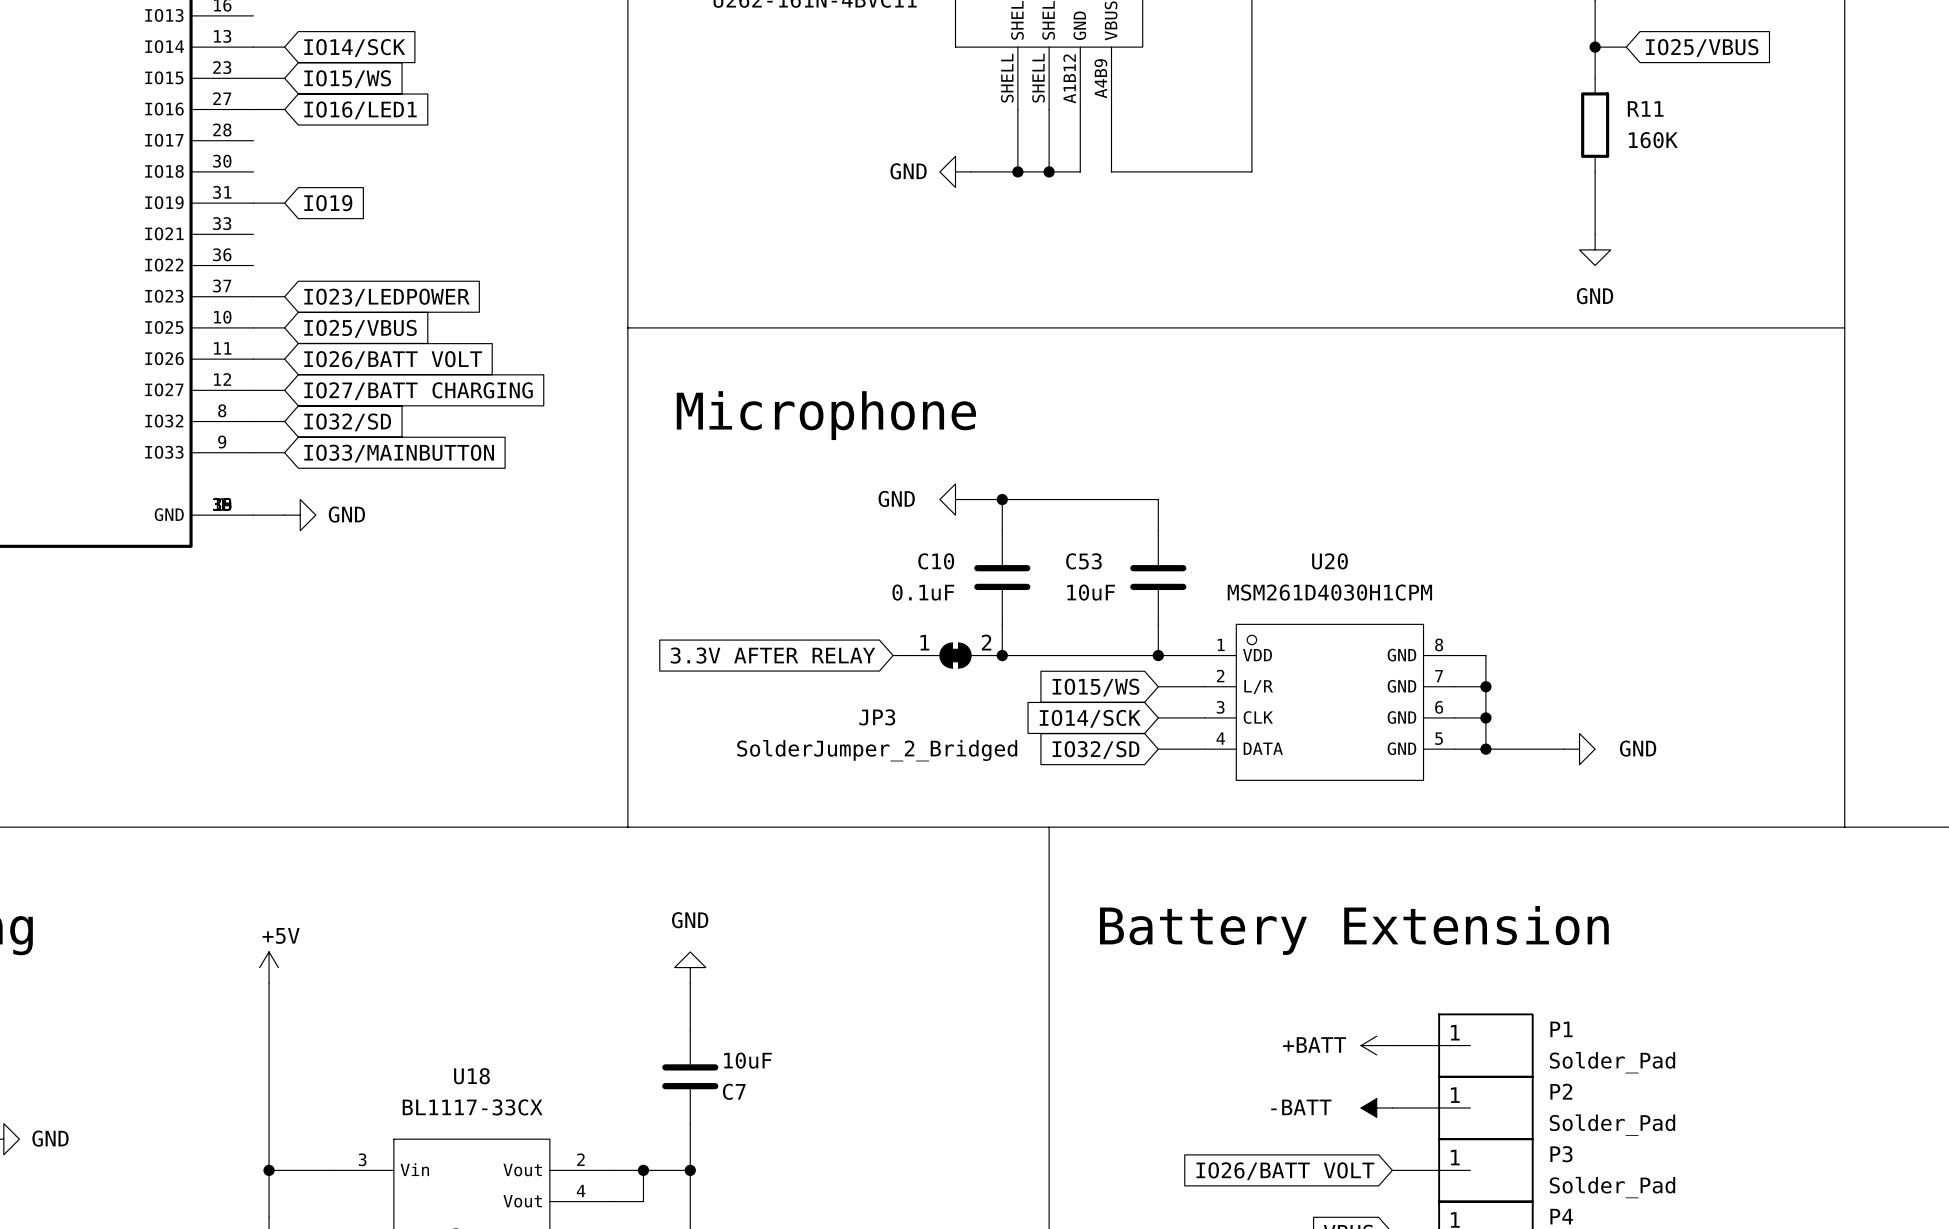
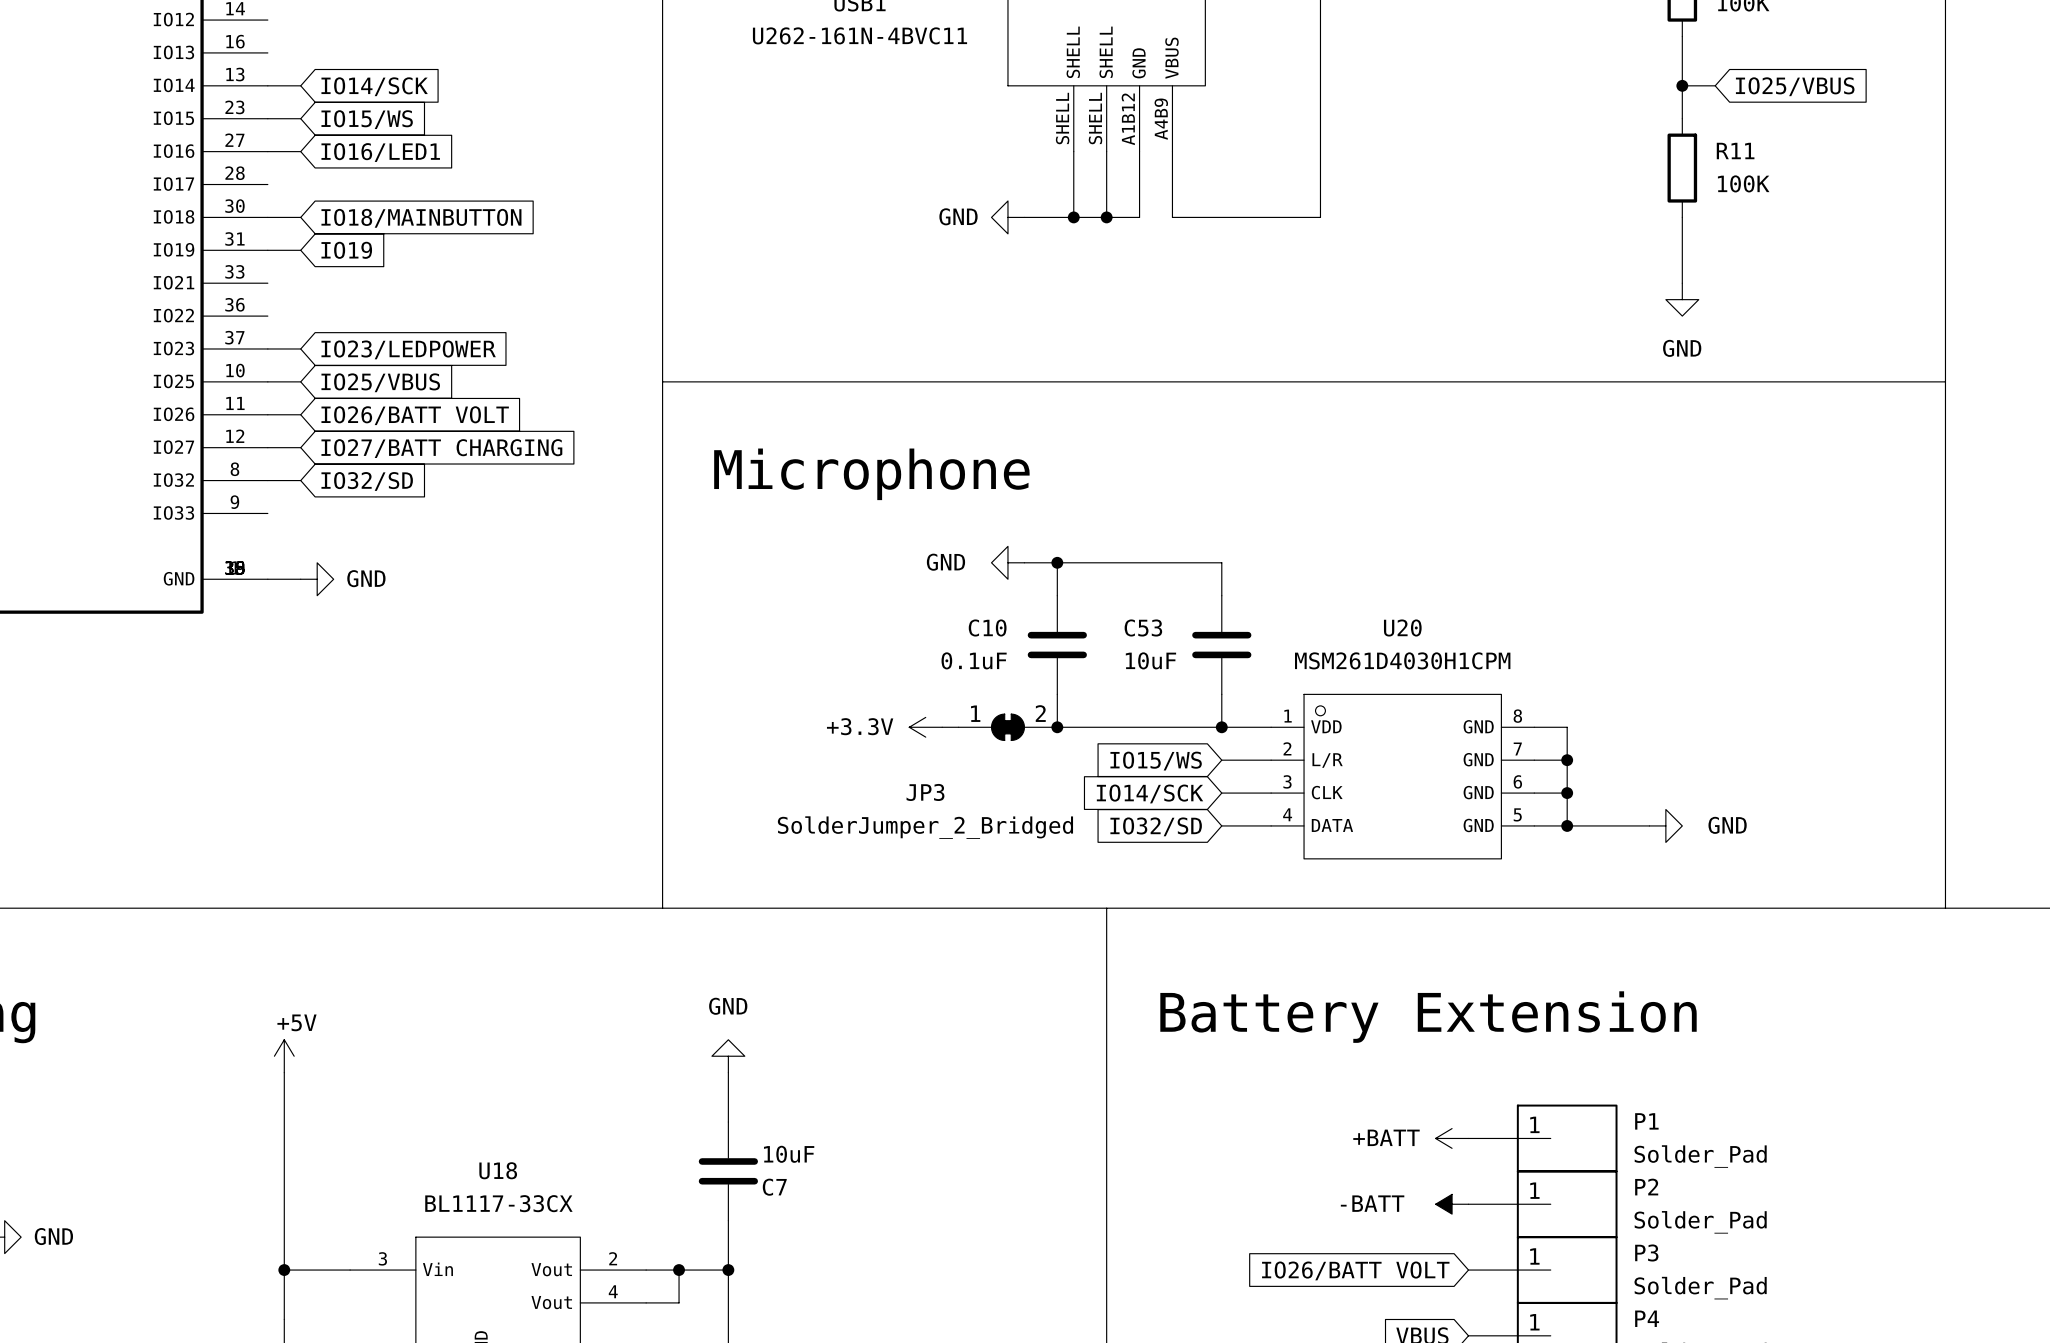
R11 value: 160K (1653, 140) -> 100K (1743, 183)
global label: none -> IO18/MAINBUTTON (421, 218)
wire: (253, 452) (284, 452) -> (267, 217) (300, 217)
global label: IO33/MAINBUTTON (399, 453) -> none
global label: 3.3V AFTER RELAY (772, 655) -> none
power symbol: none -> +3.3V (925, 727)

